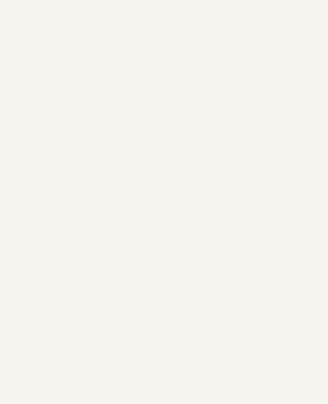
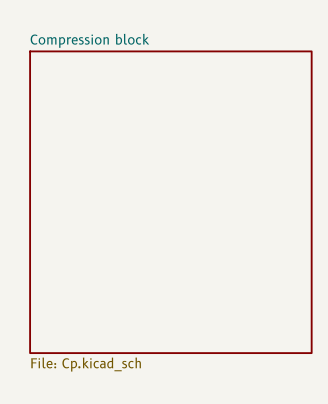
sheet Compression block: none -> File: Cp.kicad_sch (170, 202)

